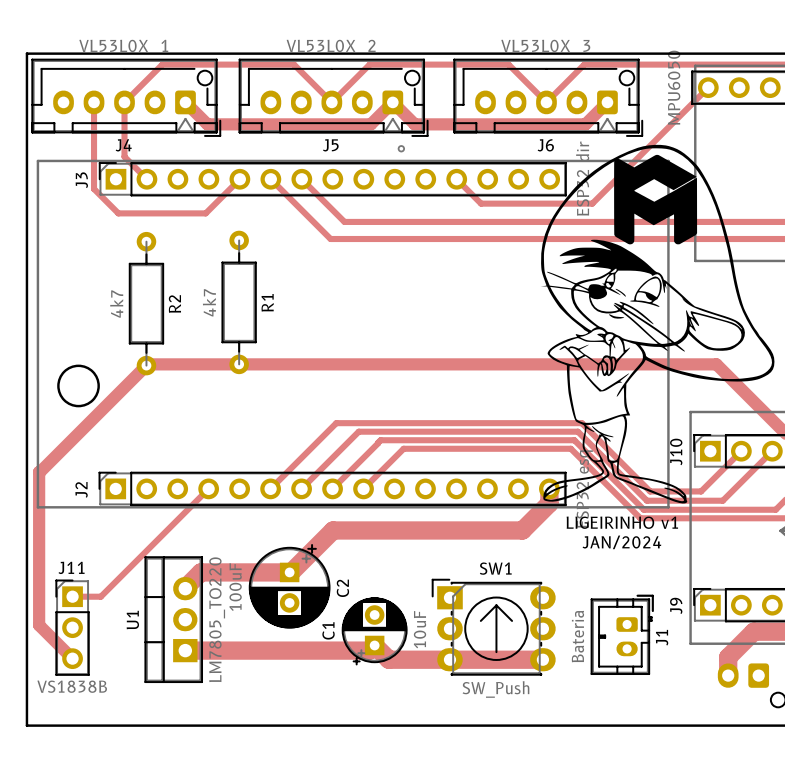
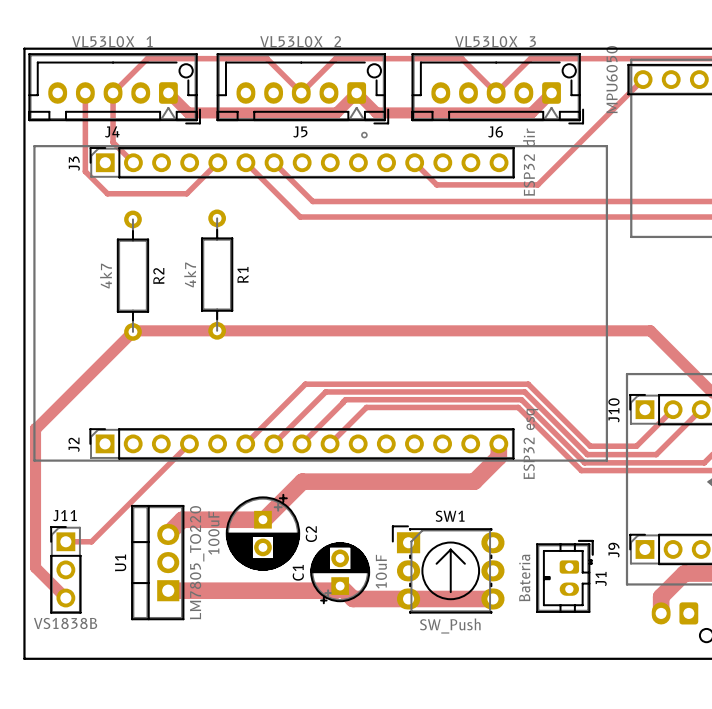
drawing: [540, 144, 775, 504] -> none
round board edge: [57, 364, 100, 408] -> none
text: LIGEIRINHO v1 (622, 522) -> none
text: JAN/2024 (621, 542) -> none

